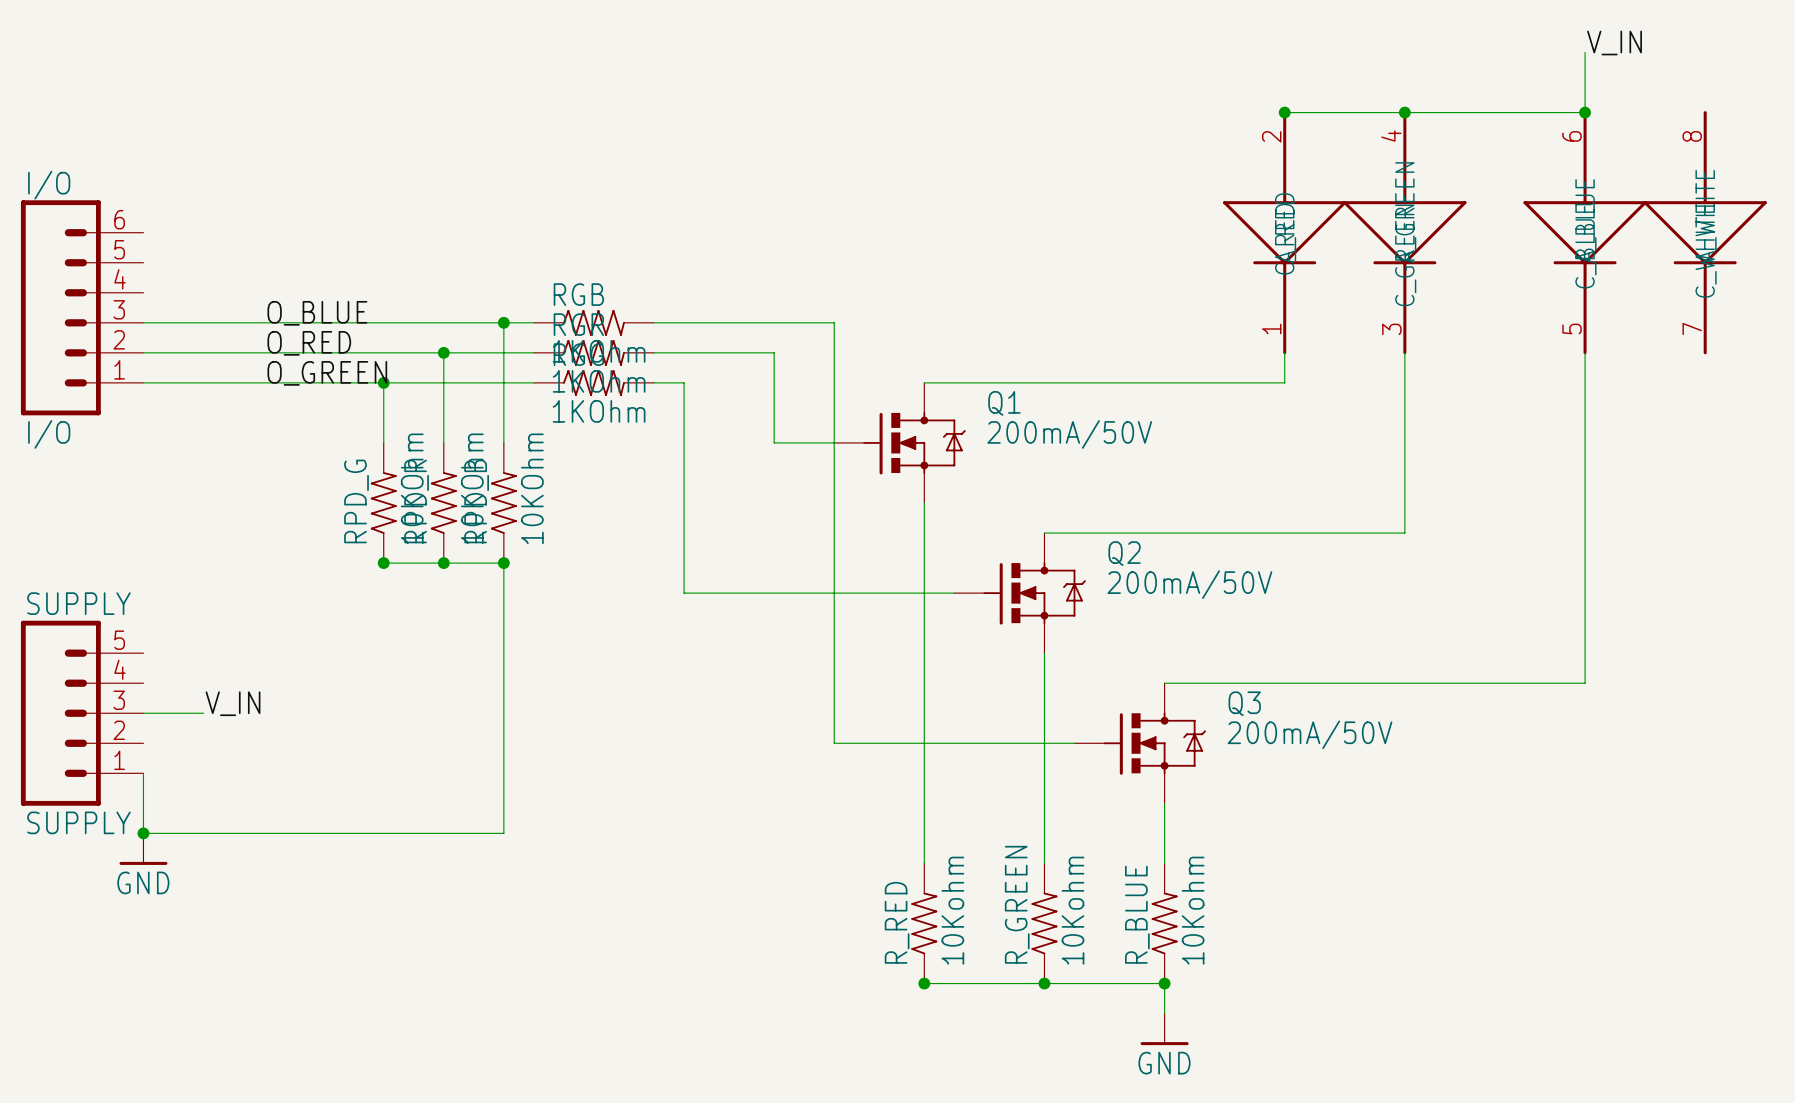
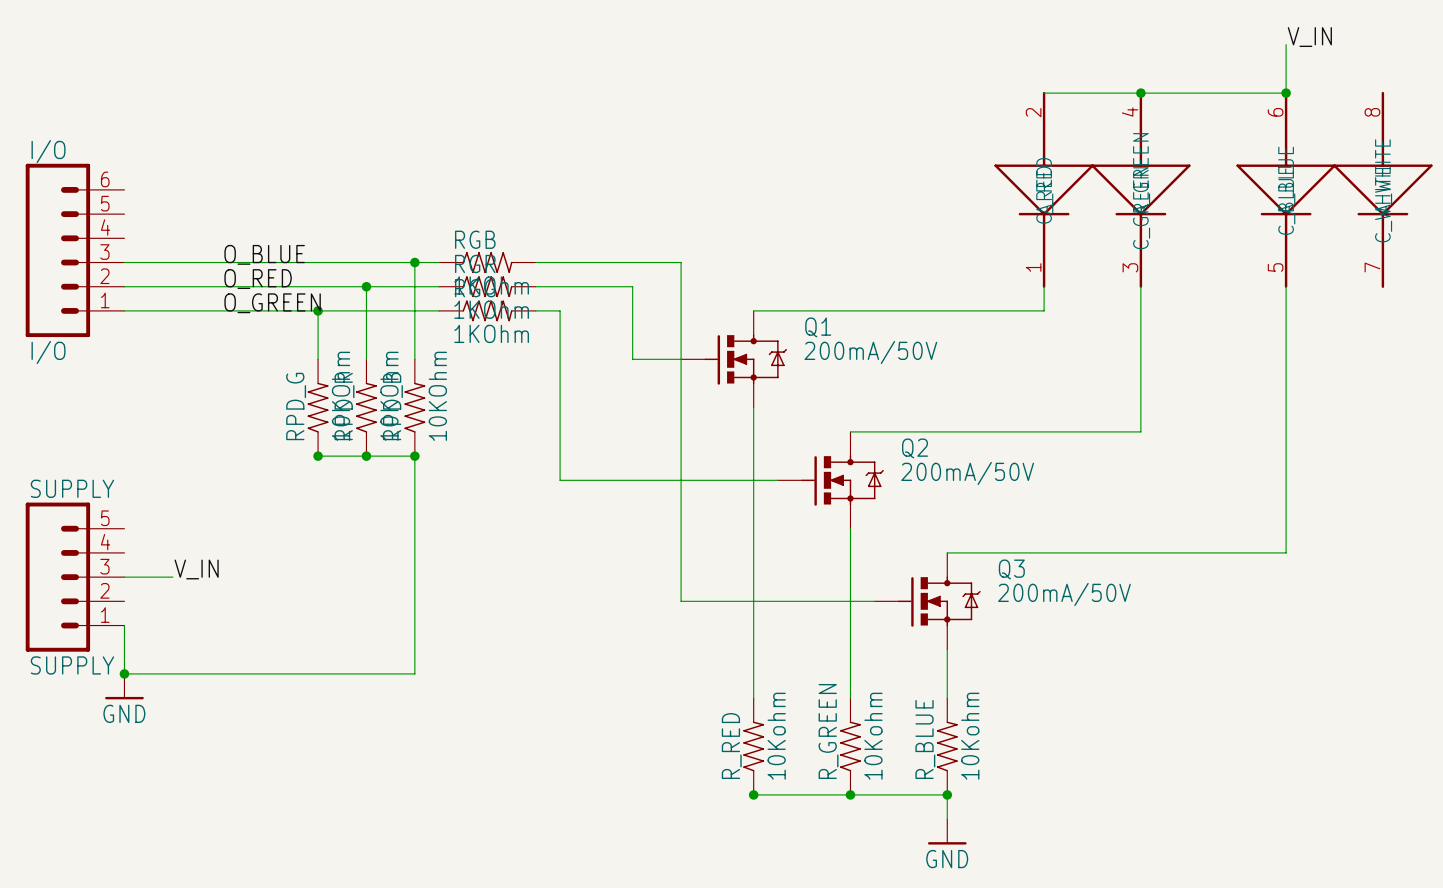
junction: (1284, 112) -> none

